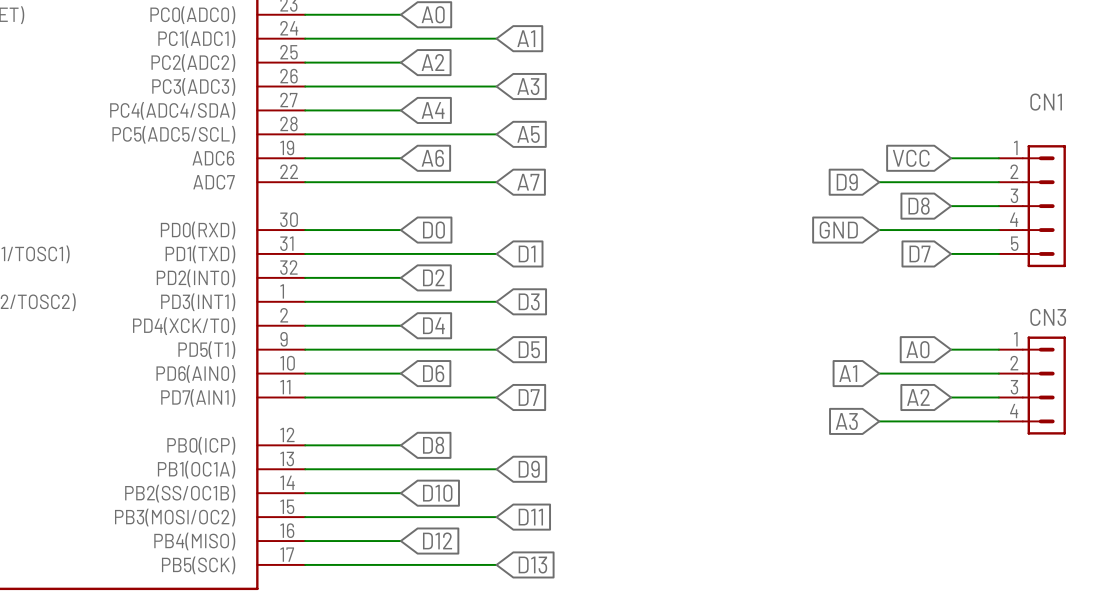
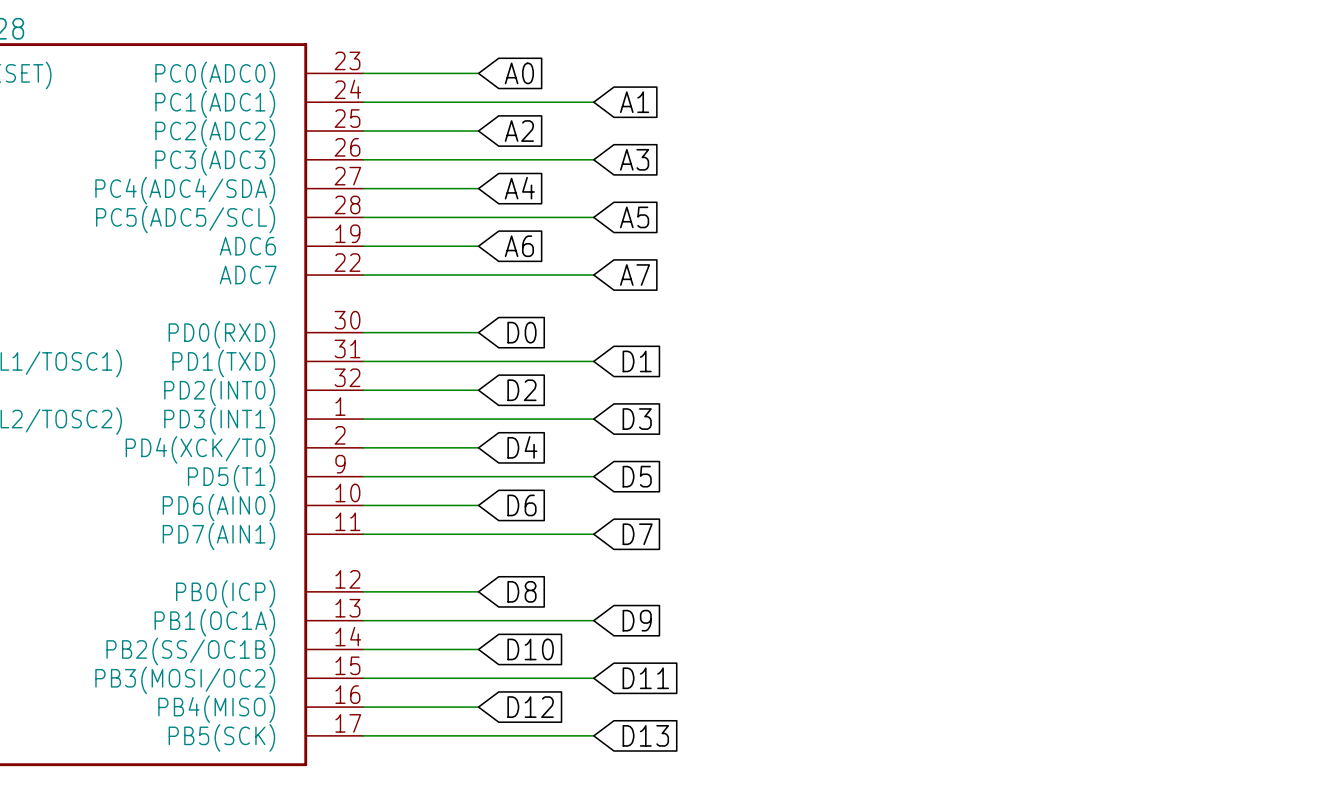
global label: VCC (911, 158) -> none
wire: (951, 158) (998, 158) -> none
global label: D9 (847, 182) -> none
wire: (879, 182) (998, 182) -> none
global label: D8 (919, 206) -> none
wire: (951, 206) (998, 206) -> none
CN1: (1032, 206) -> none
global label: GND (838, 230) -> none
wire: (879, 230) (998, 230) -> none
global label: D7 (919, 253) -> none
wire: (951, 253) (998, 253) -> none
global label: A0 (917, 349) -> none
wire: (951, 349) (998, 349) -> none
global label: A1 (848, 373) -> none
wire: (879, 373) (998, 373) -> none
CN3: (1032, 385) -> none
global label: A2 (918, 397) -> none
wire: (951, 397) (998, 397) -> none
global label: A3 (846, 421) -> none
wire: (879, 421) (998, 421) -> none

